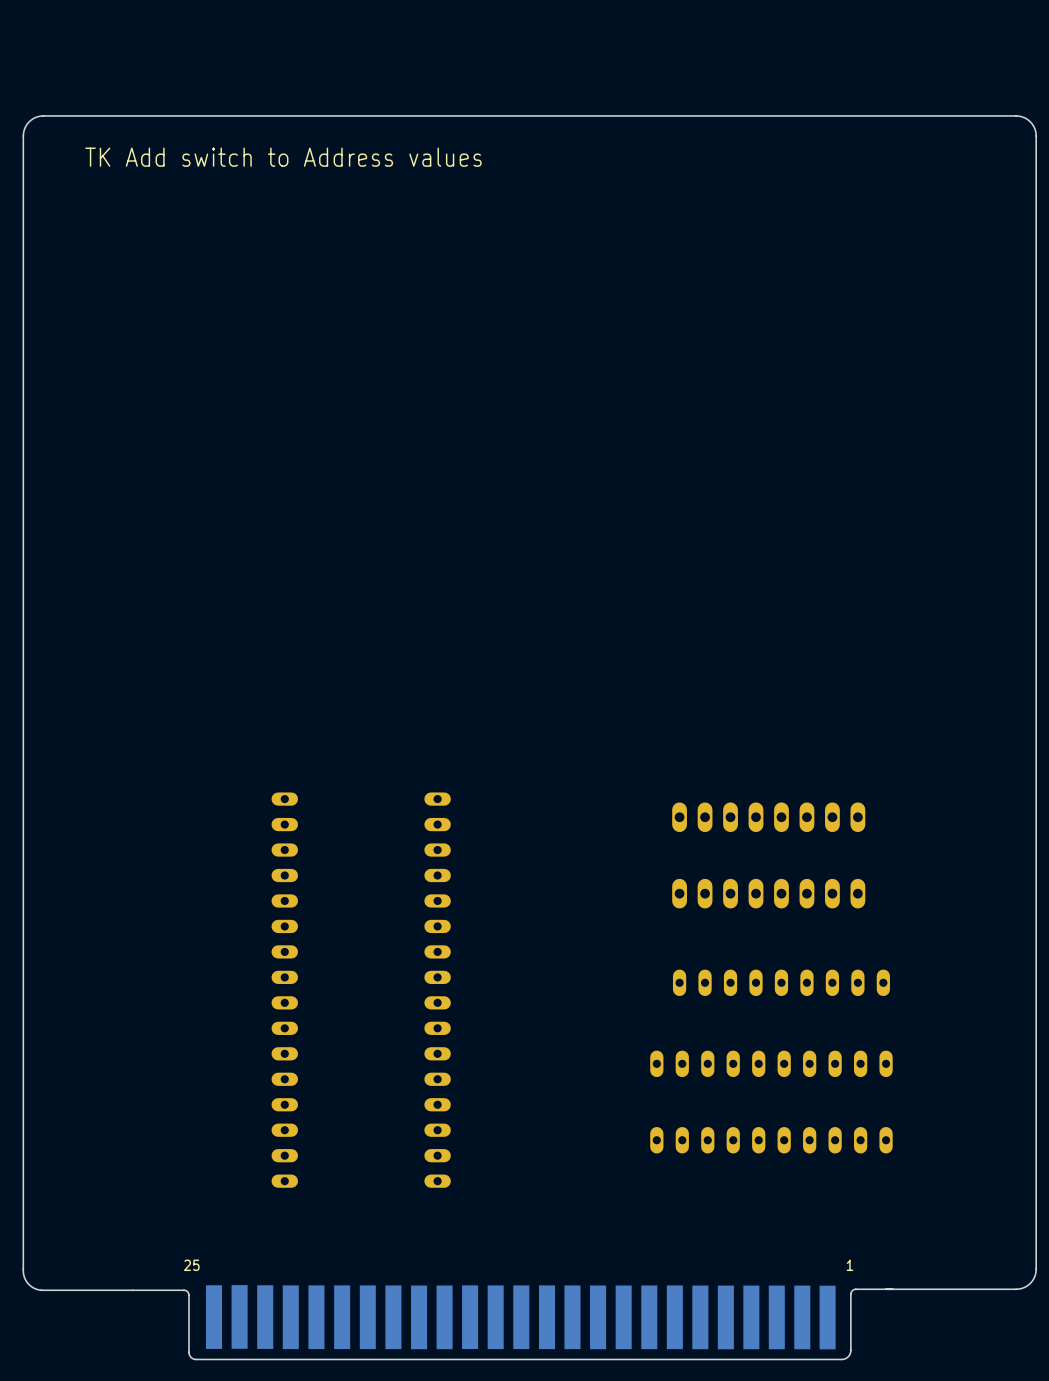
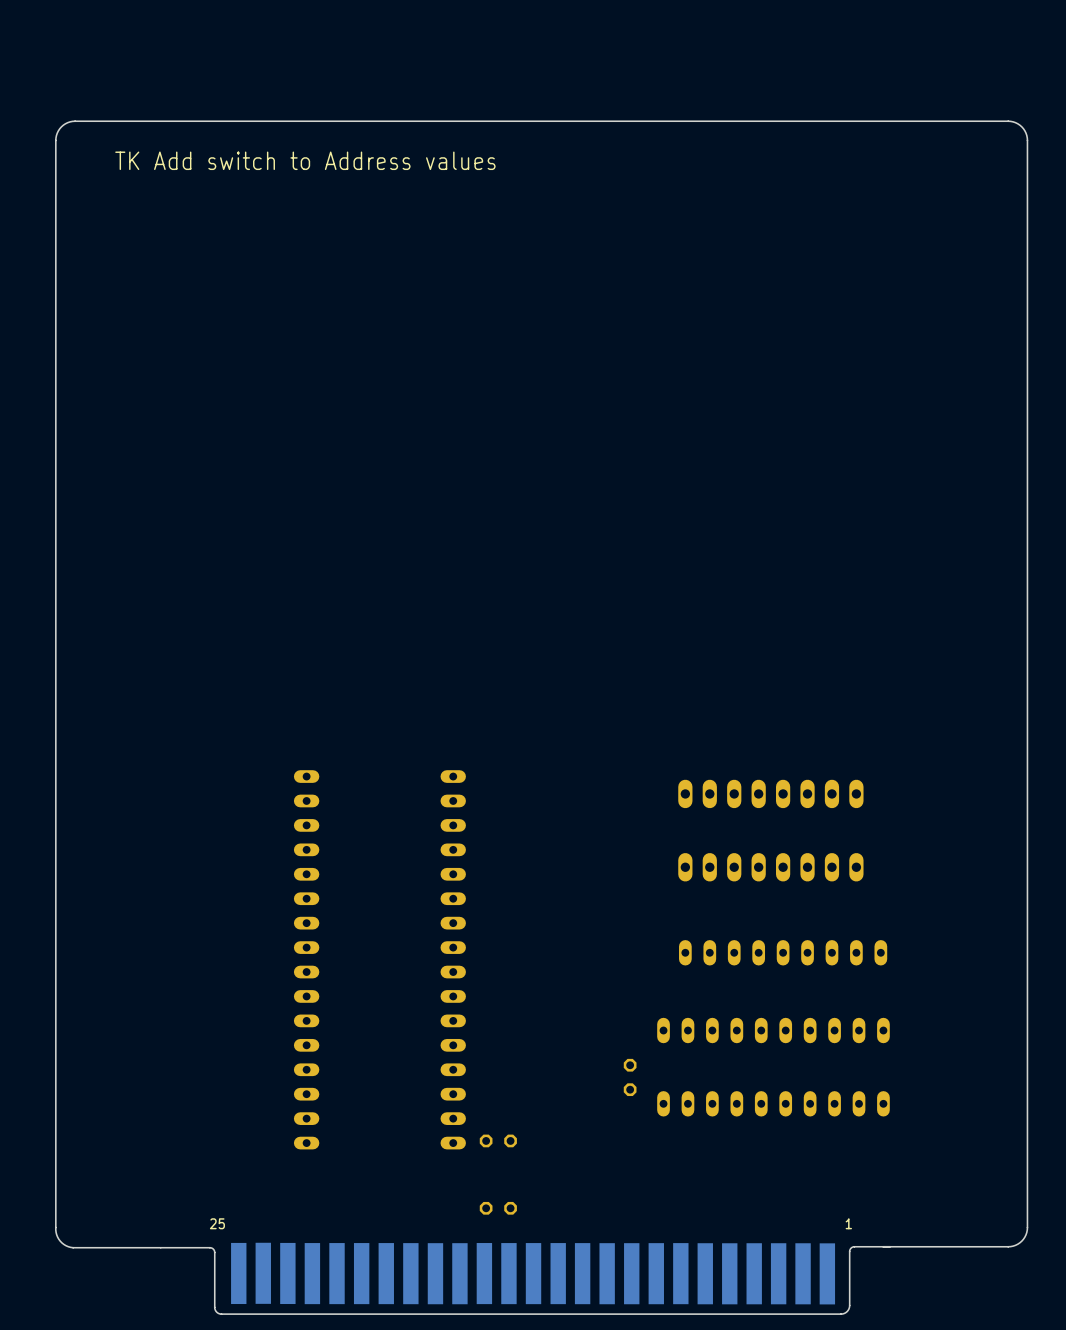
part: none -> (630, 1077)
part: none -> (498, 1140)
part: none -> (498, 1208)

